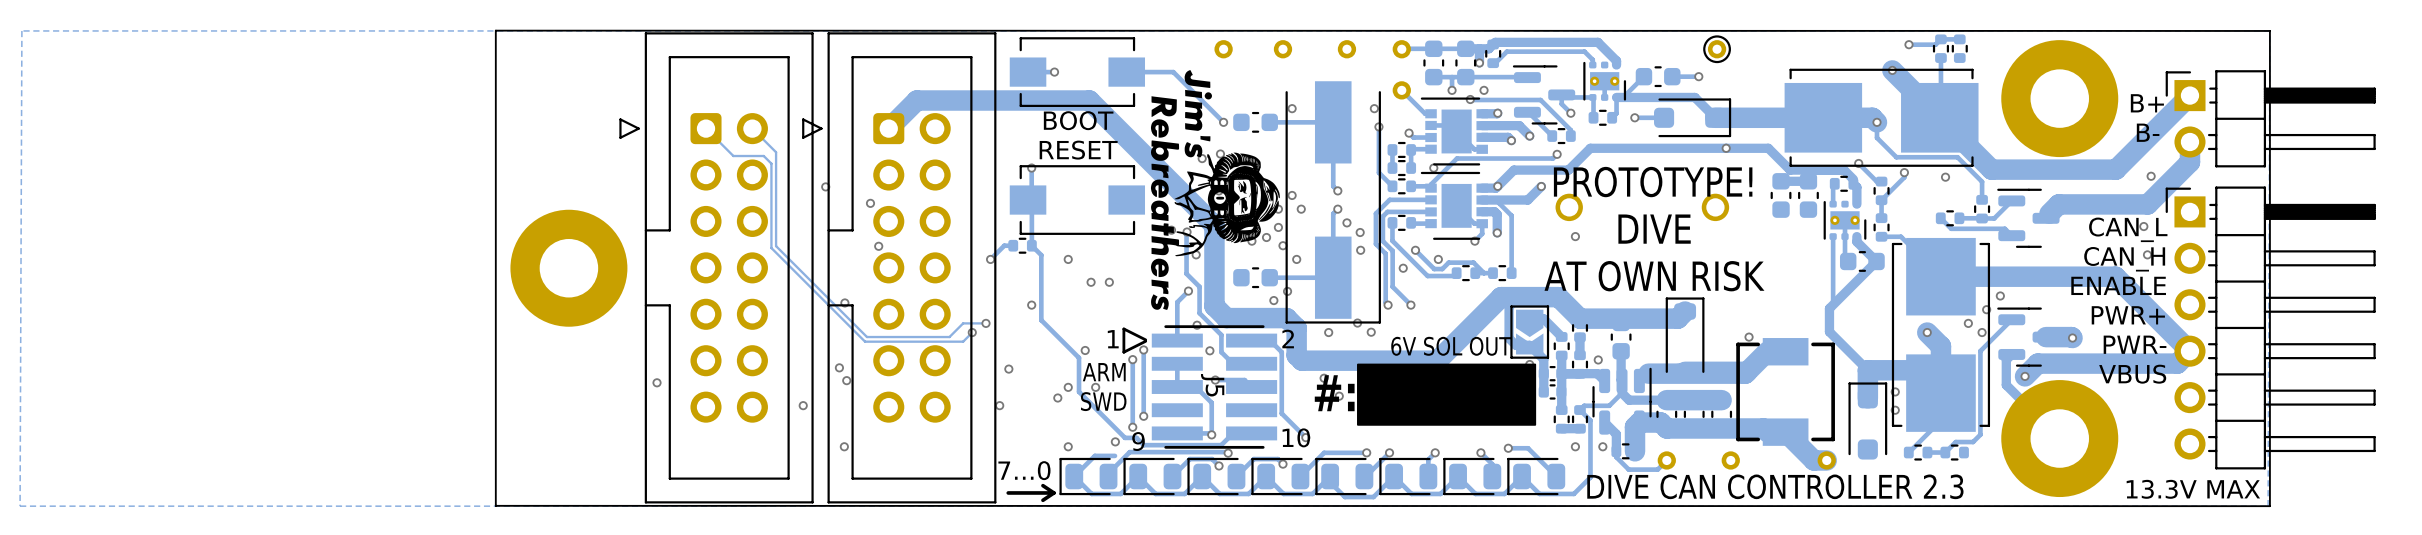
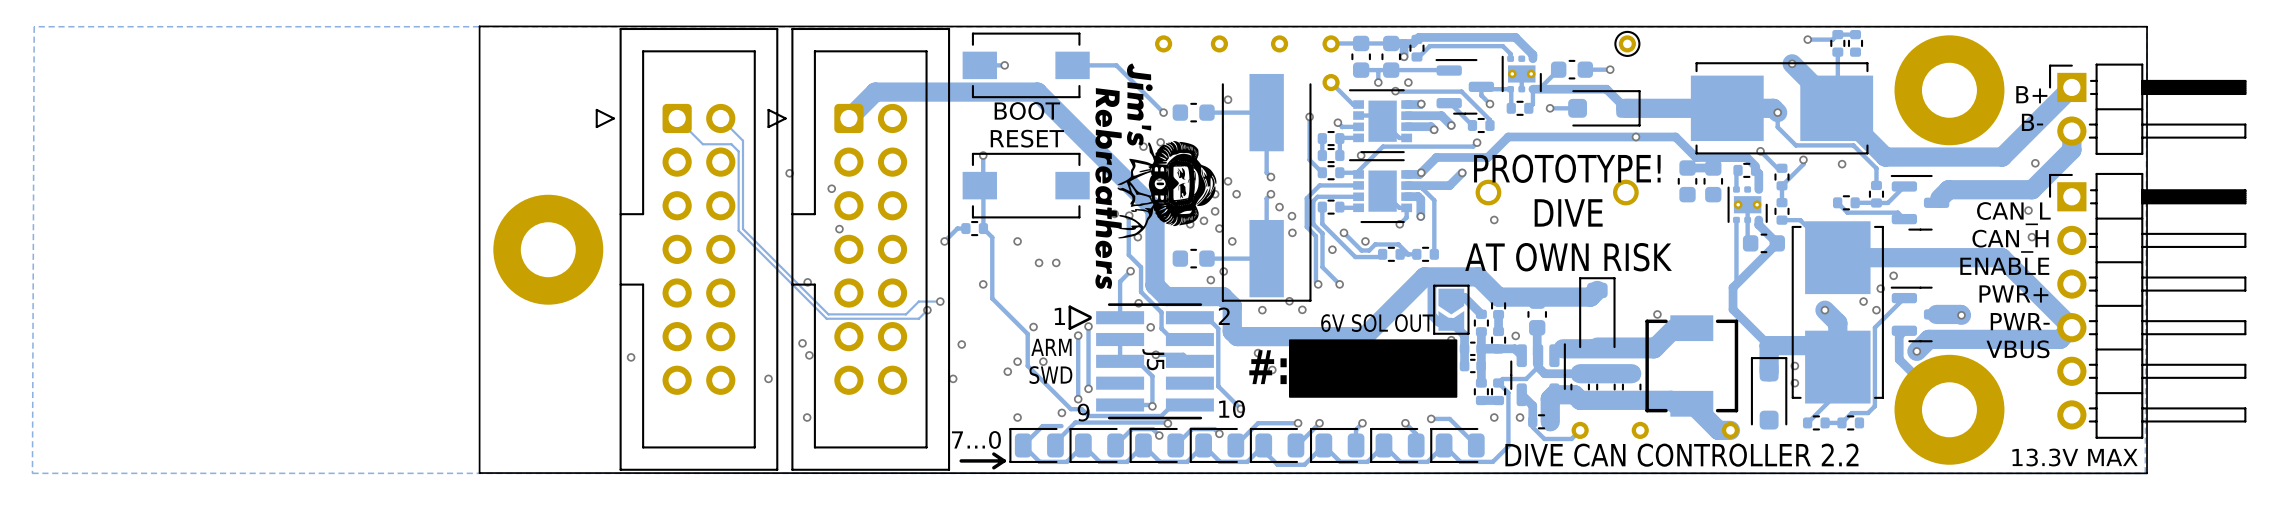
via: (1374, 108) -> none
text: DIVE CAN CONTROLLER 2.3 (1775, 486) -> DIVE CAN CONTROLLER 2.2 (1681, 455)

